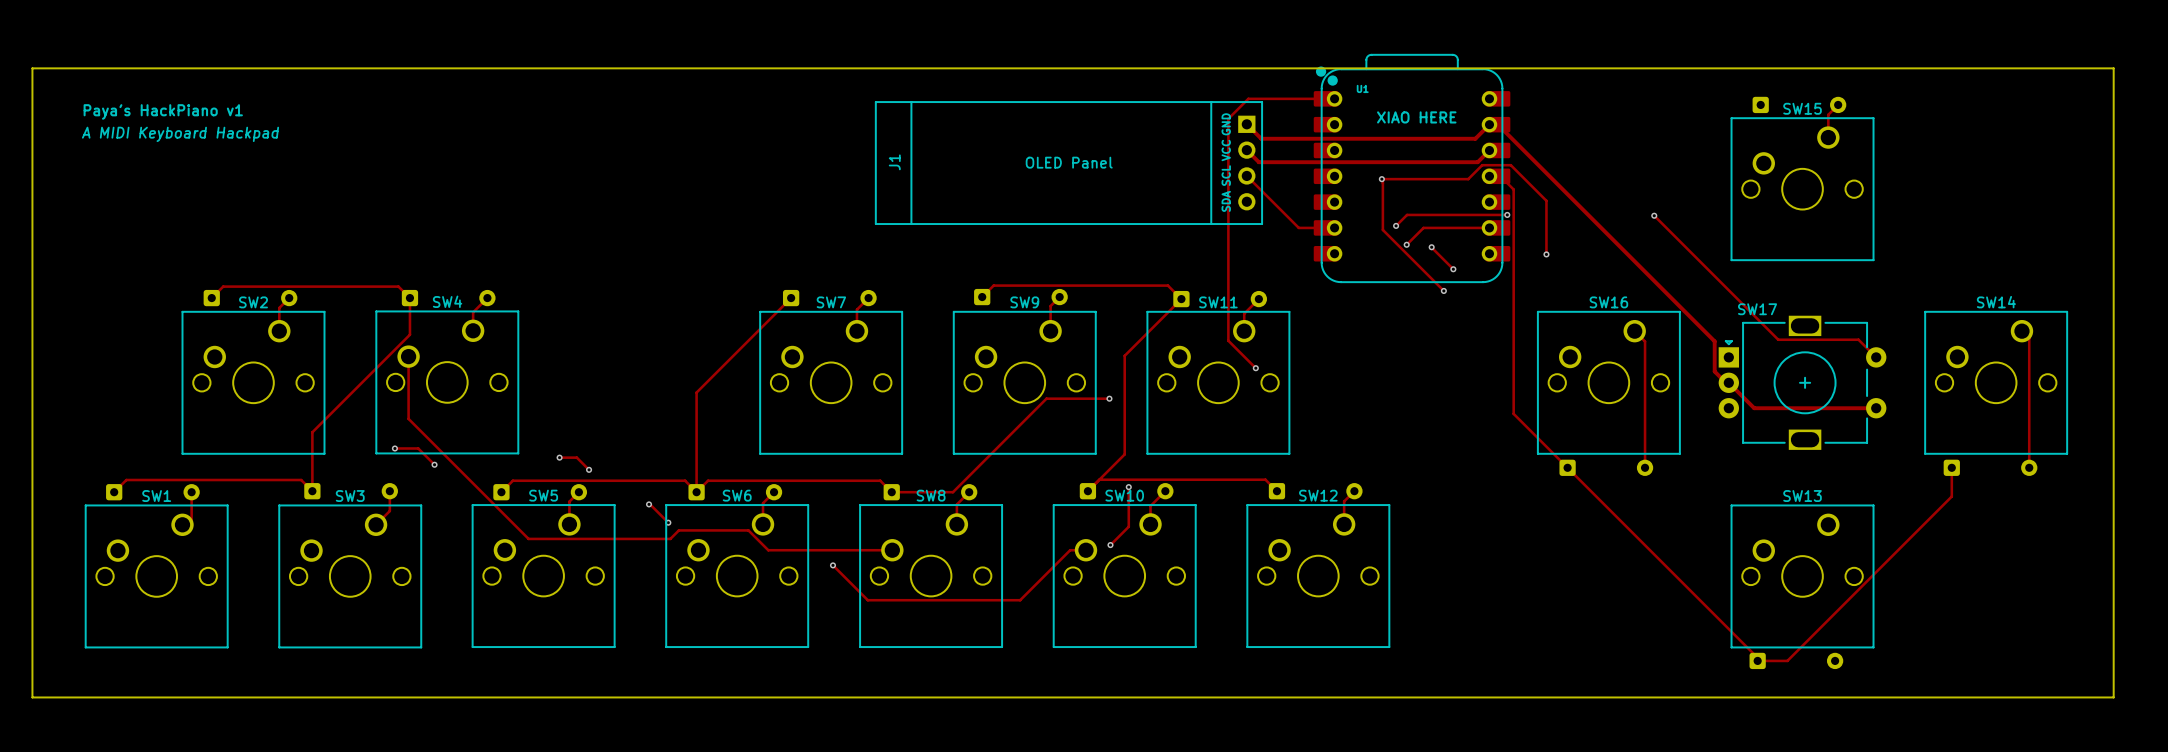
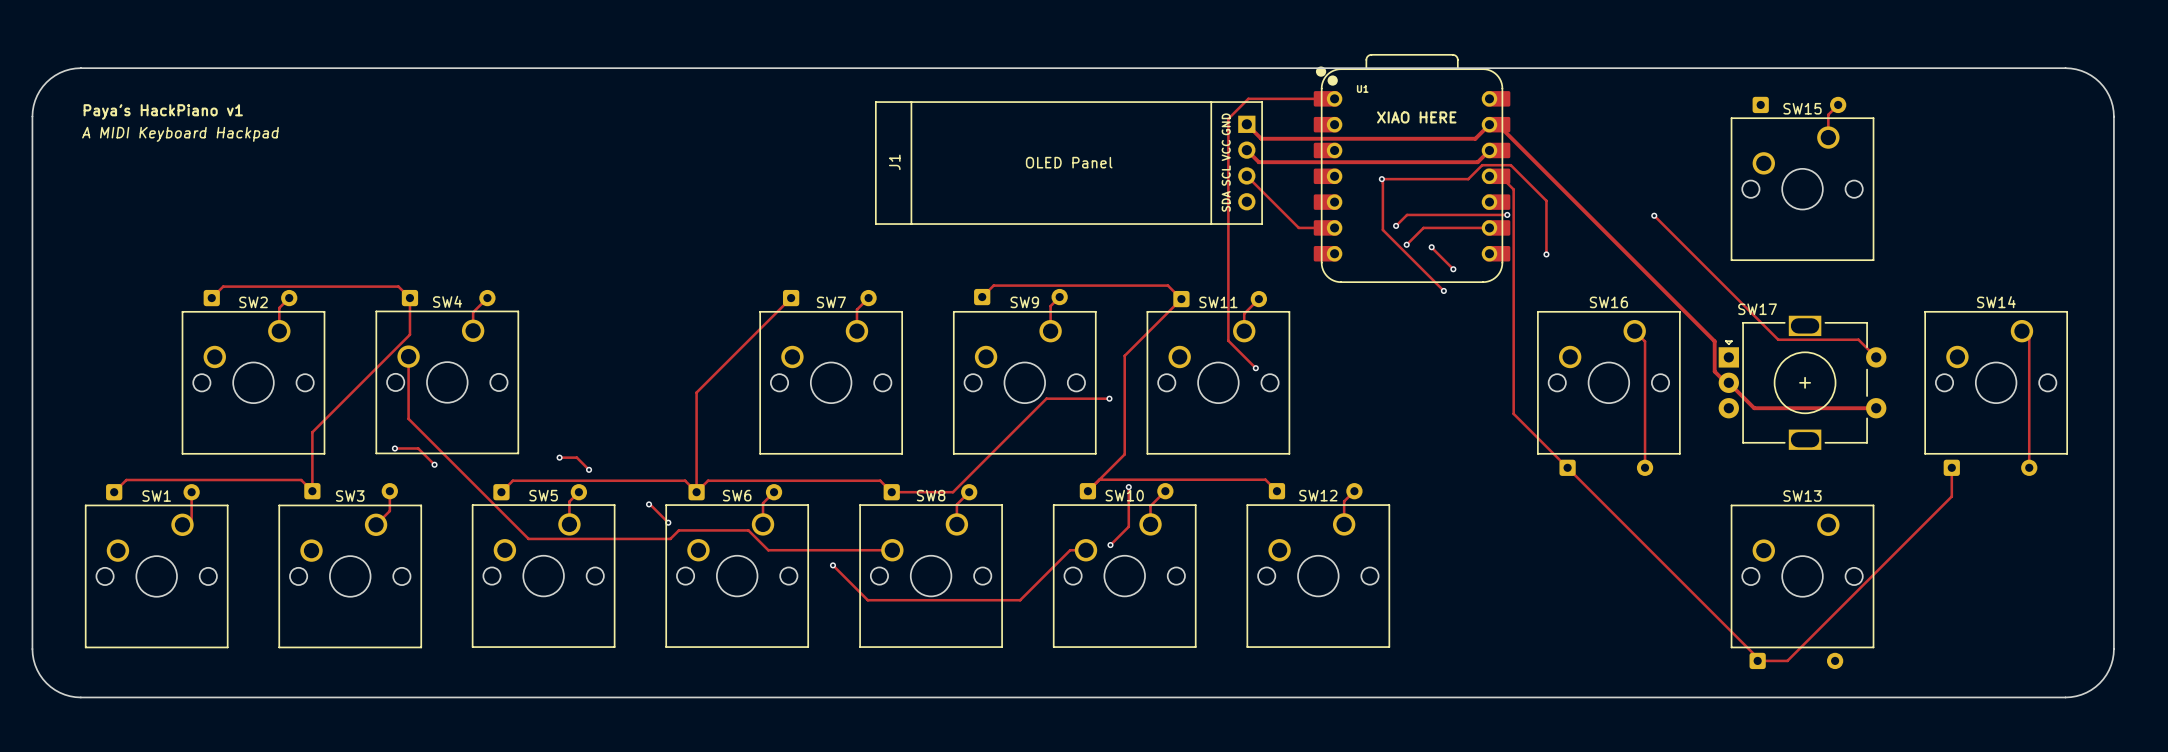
board edge: (32, 116) (32, 68) (2113, 68) (2113, 697) (2065, 697) -> (32, 116) (35, 100) (46, 82) (59, 72) (80, 68) (2076, 69) (2091, 75) (2099, 82) (2109, 95) (2113, 111) (2113, 649) (2111, 665) (2099, 683) (2086, 692) (2065, 697)
board edge: (32, 649) (32, 697) (80, 697) -> (32, 649) (35, 665) (46, 683) (64, 694) (80, 697)

